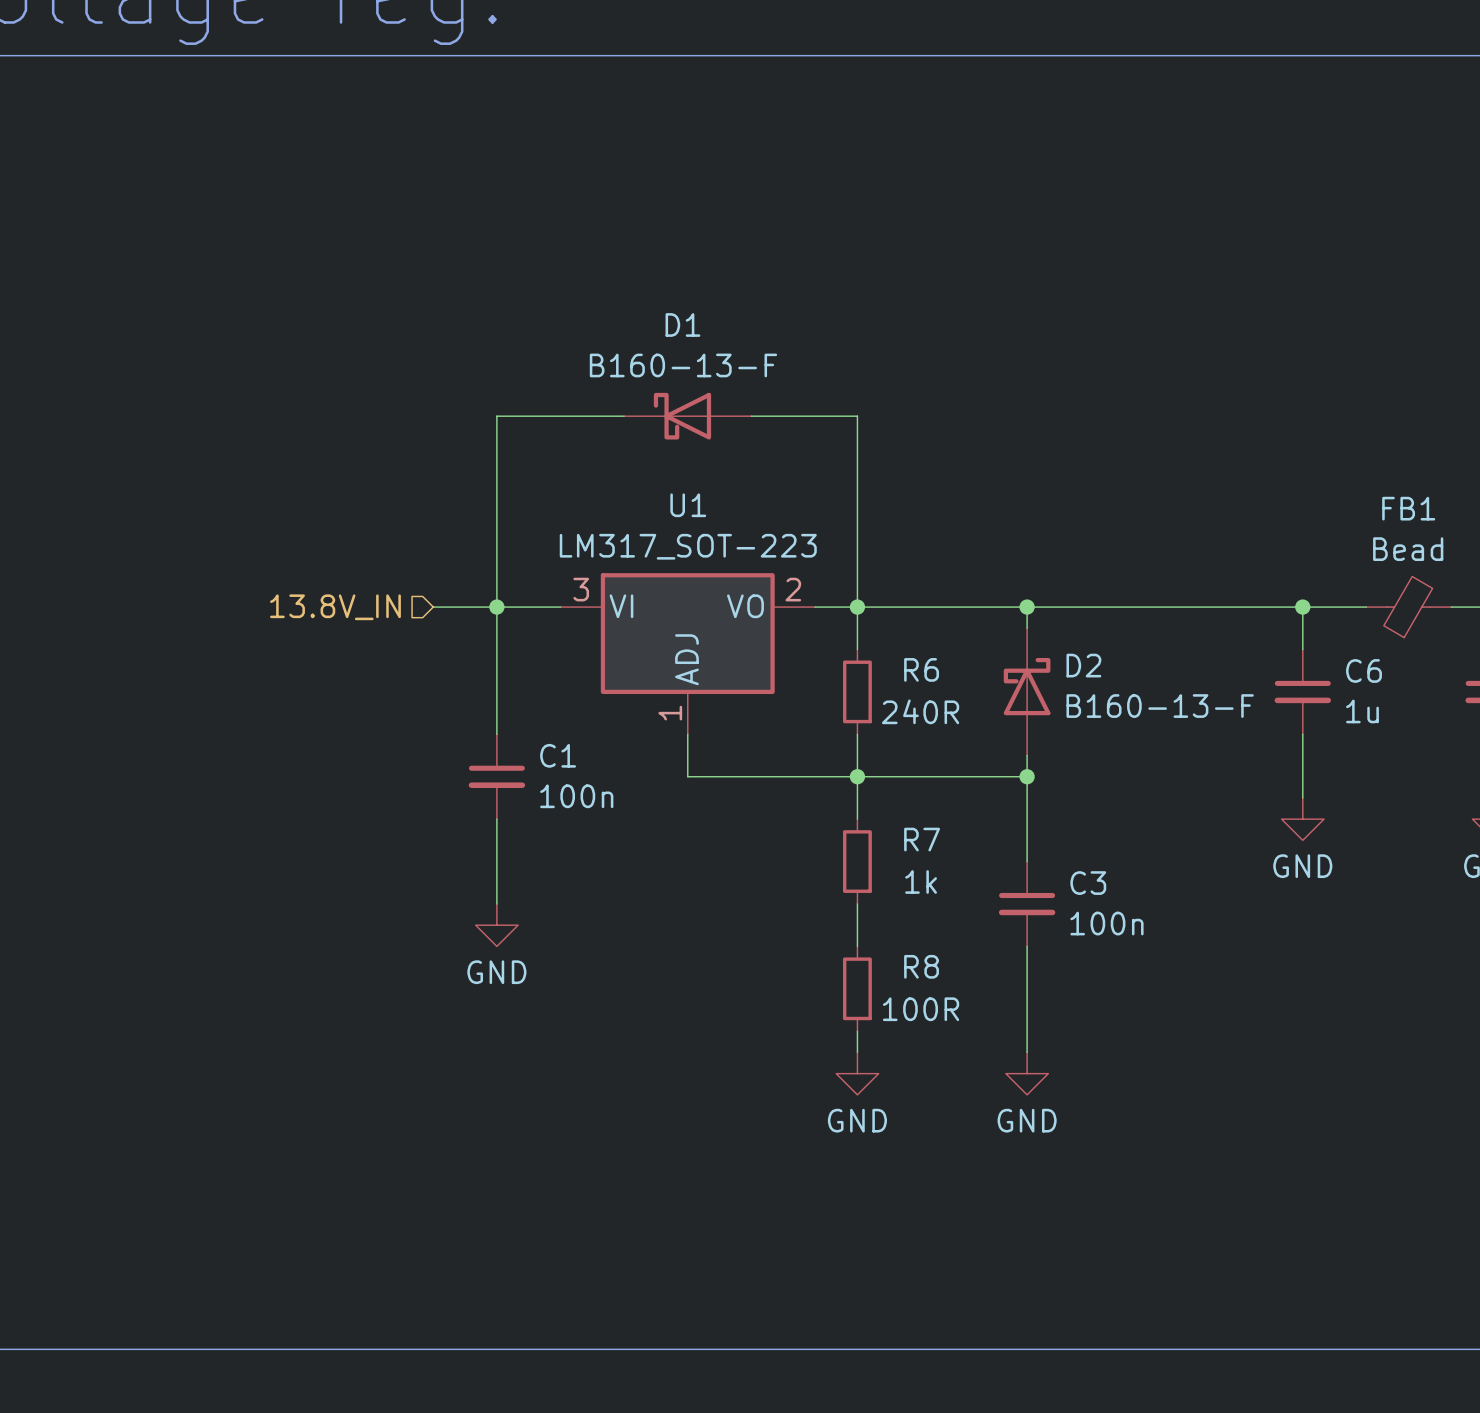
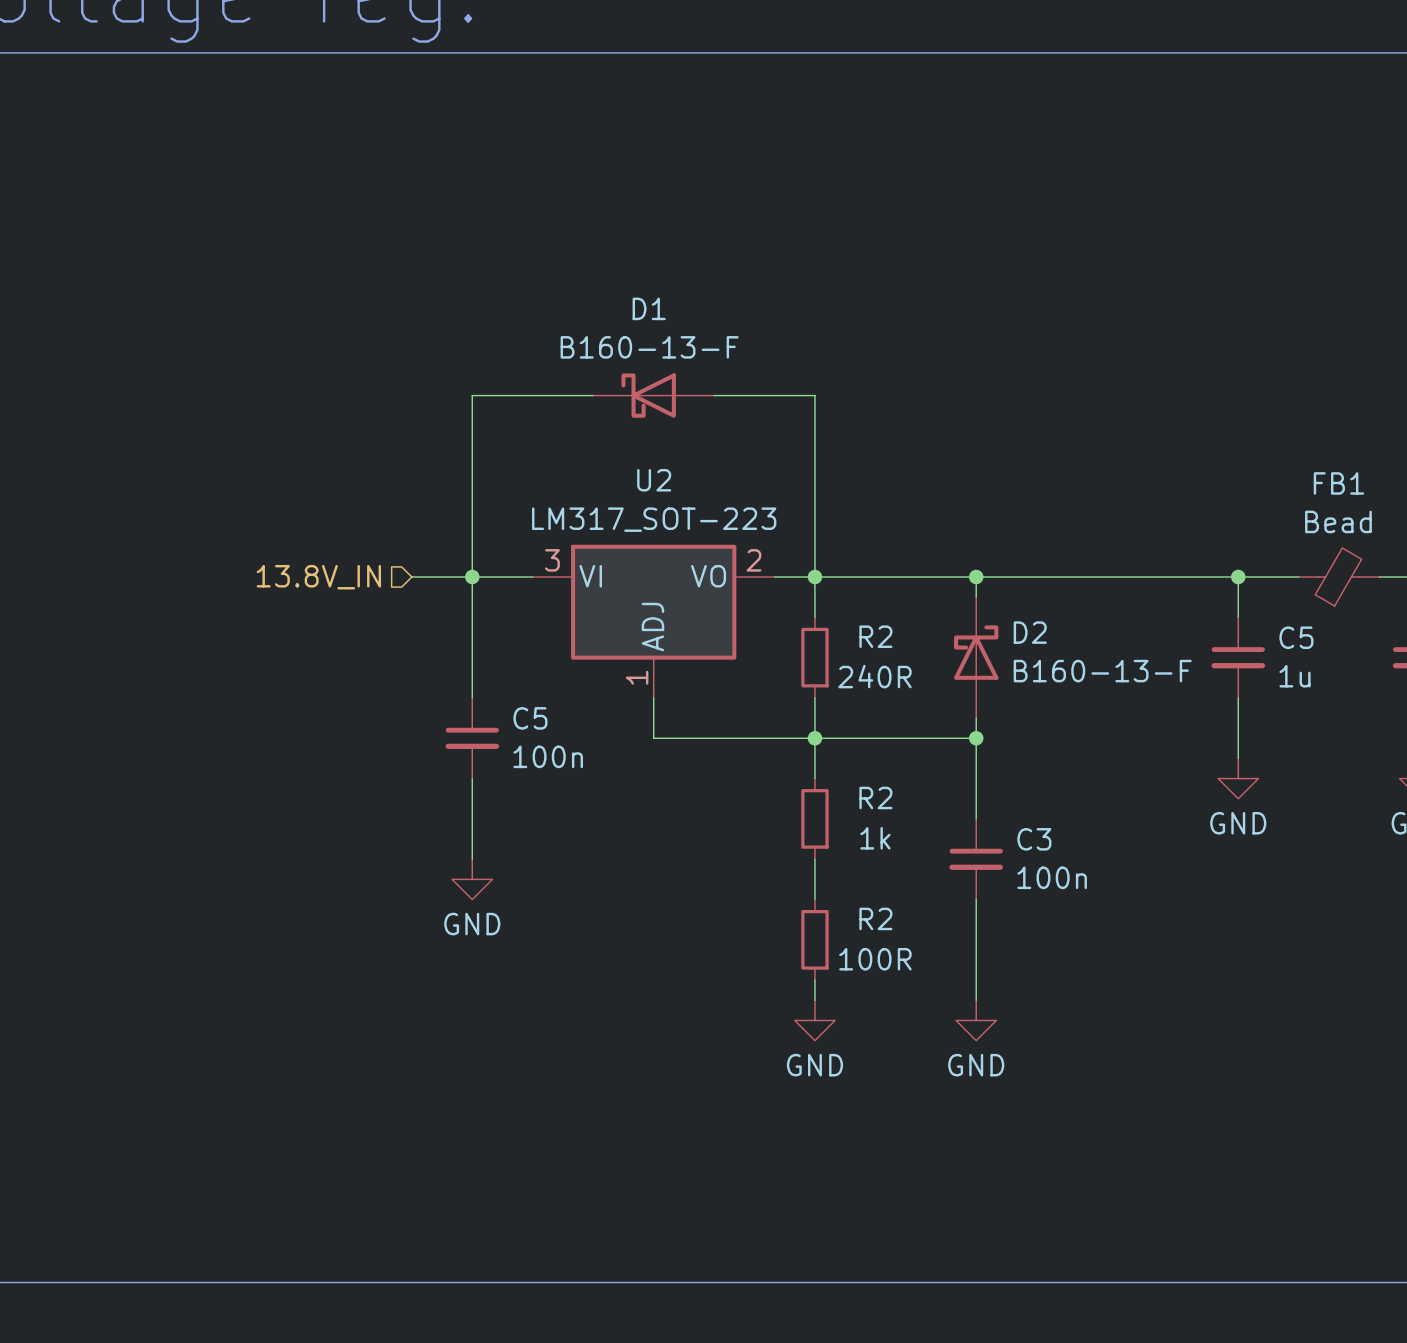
U1 name: U1 (688, 505) -> U2 (654, 480)
R6 name: R6 (921, 669) -> R2 (875, 636)
C6 name: C6 (1363, 670) -> C5 (1296, 637)
C1 name: C1 (558, 755) -> C5 (530, 718)
R7 name: R7 (922, 839) -> R2 (875, 797)
R8 name: R8 (921, 966) -> R2 (875, 918)

